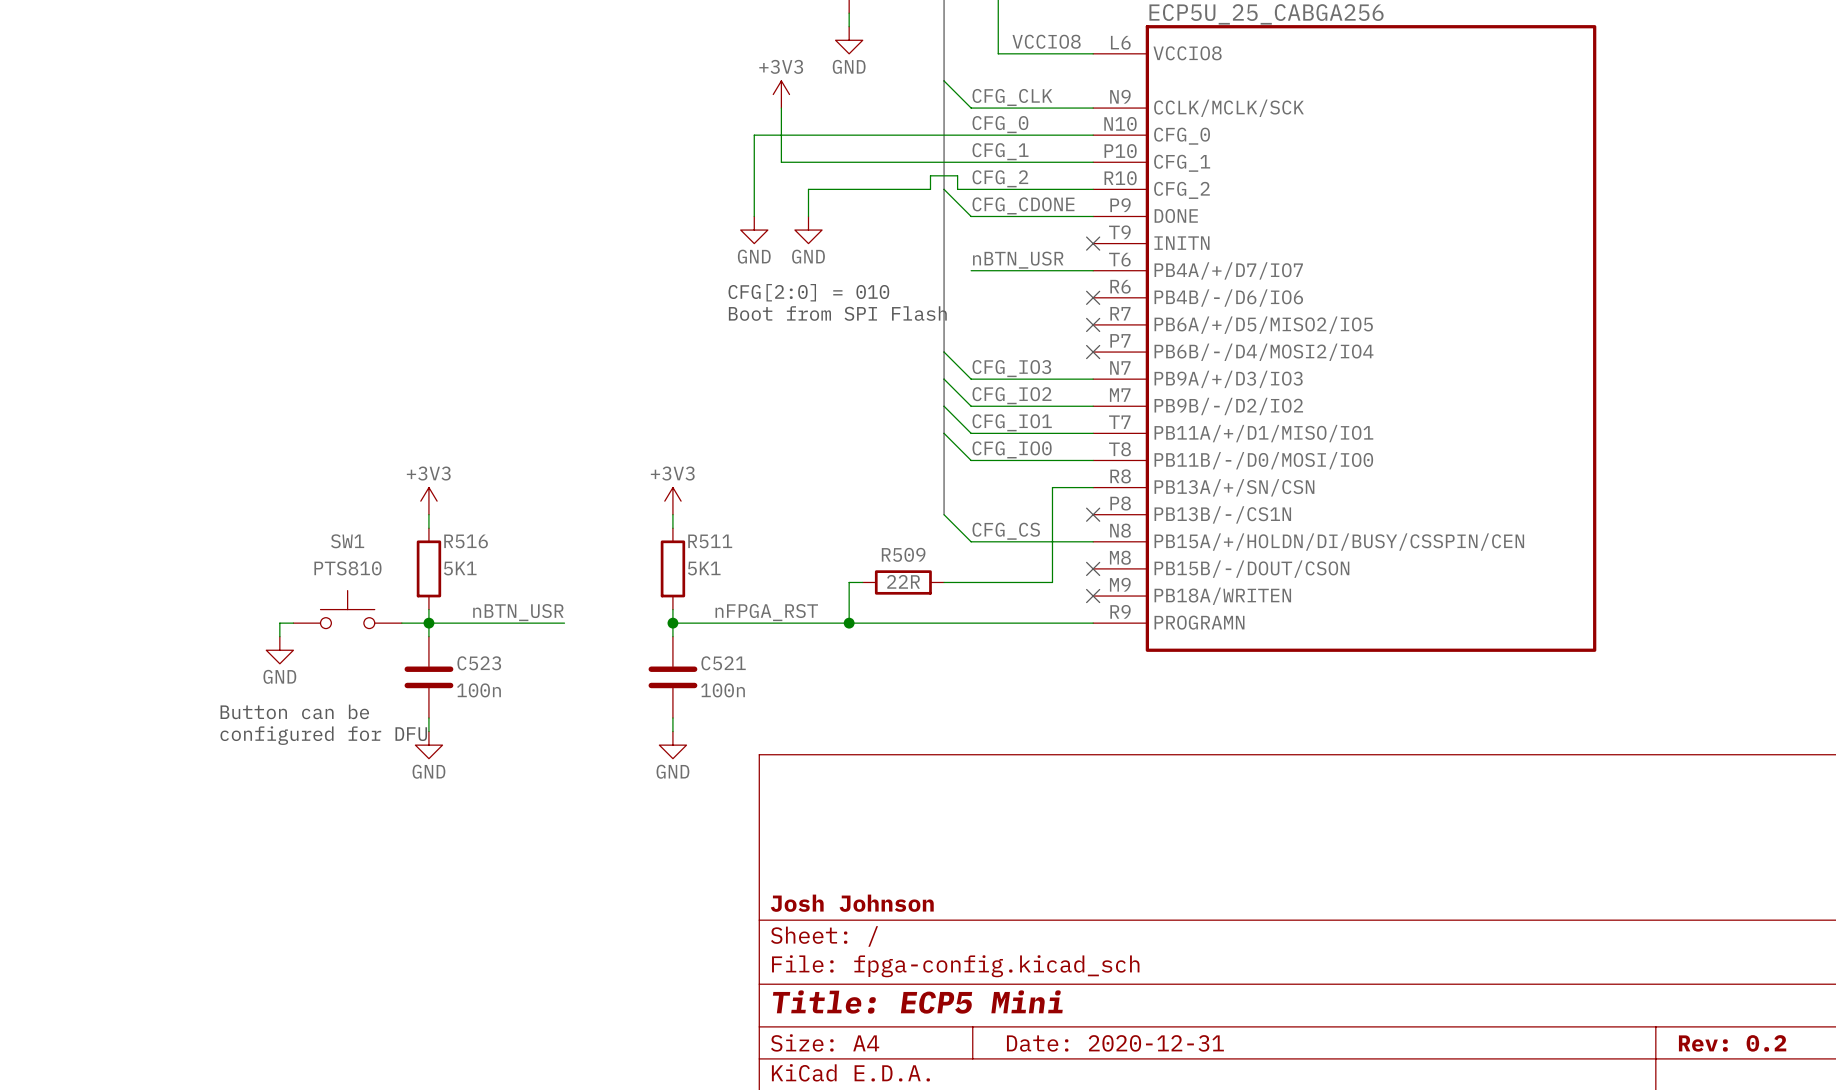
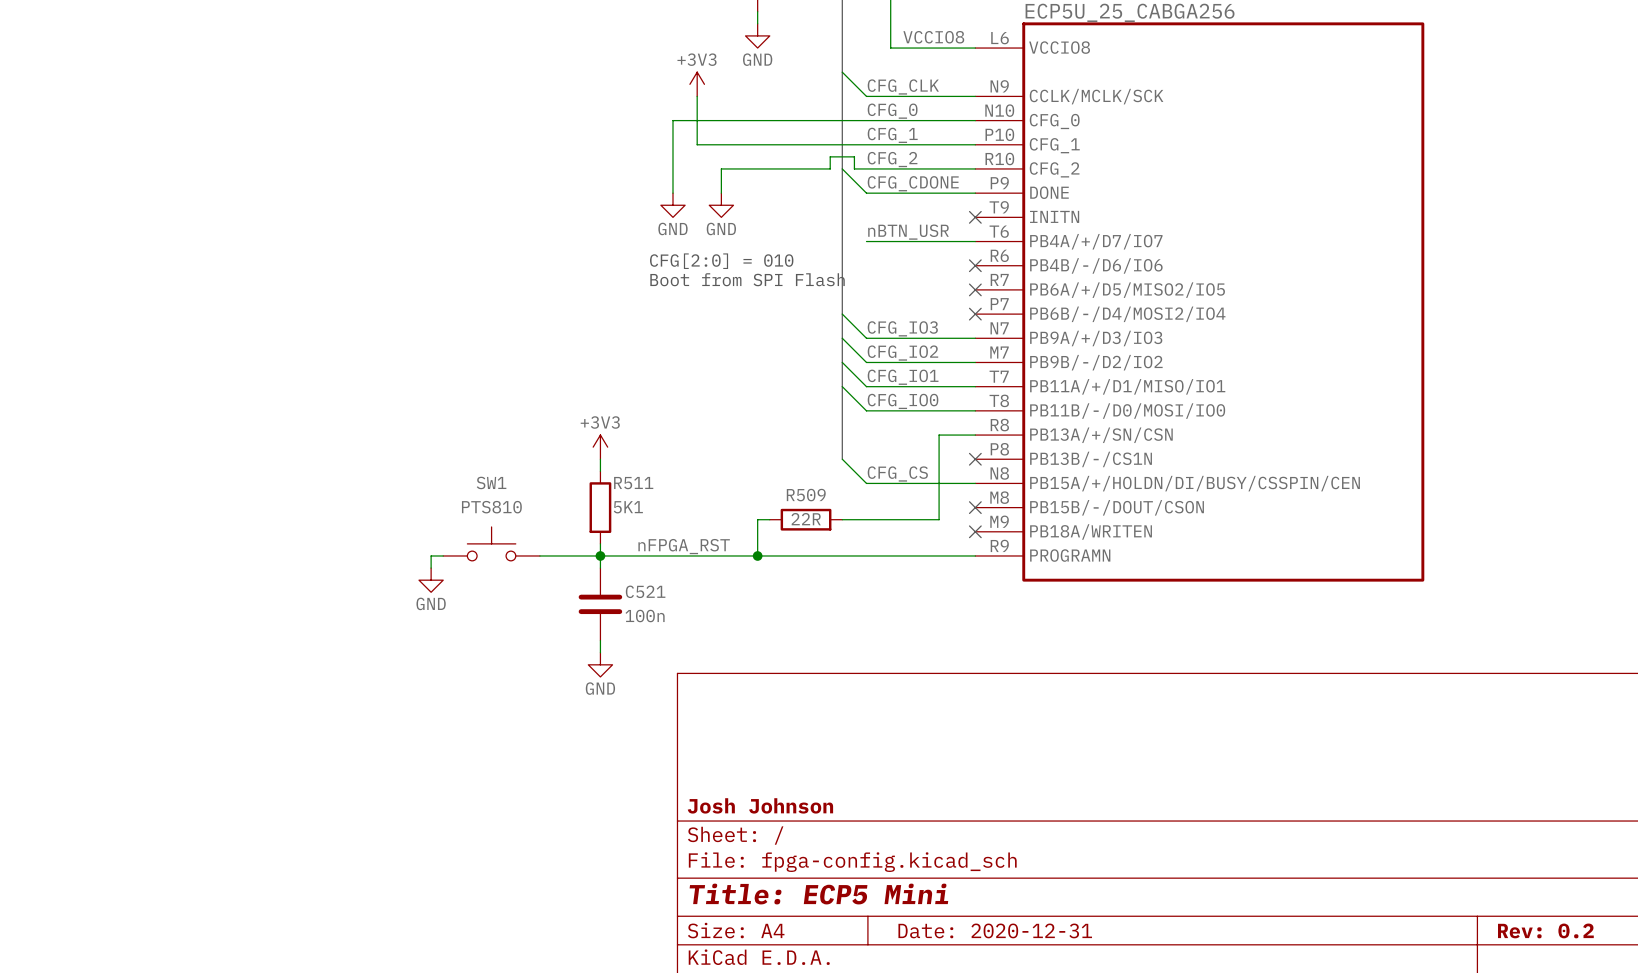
power symbol: +3V3 (428, 501) -> none
wire: (428, 514) (428, 528) -> none
R516: 5K1 (428, 568) -> none
SW1 position: (347, 609) -> (491, 543)
wire: (428, 609) (428, 636) -> none
label: nBTN_USR (518, 612) -> none
wire: (293, 623) (279, 623) (279, 636) -> none
wire: (401, 623) (483, 623) -> (431, 568) (431, 555)
junction: (428, 623) -> none
wire: (496, 623) (564, 623) -> (539, 555) (600, 555)
power symbol: GND (279, 650) -> none
power symbol: none -> GND (431, 580)
C523: 100n (428, 677) -> none
text: Button can be (294, 711) -> none
wire: (428, 718) (428, 731) -> none
text: configured for DFU (323, 735) -> none
power symbol: GND (428, 745) -> none

